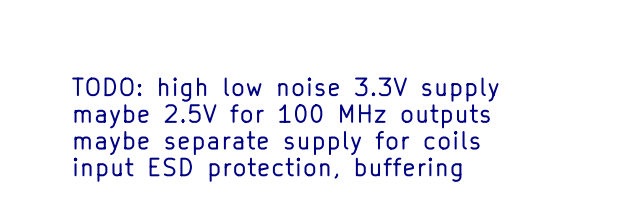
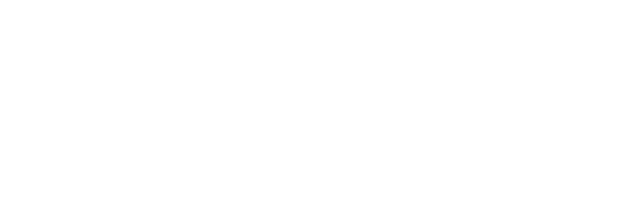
text: TODO: high low noise 3.3V supply (285, 89) -> none
text: maybe 2.5V for 100 MHz outputs (282, 116) -> none
text: maybe separate supply for coils (277, 143) -> none
text: input ESD protection, buffering (267, 169) -> none

